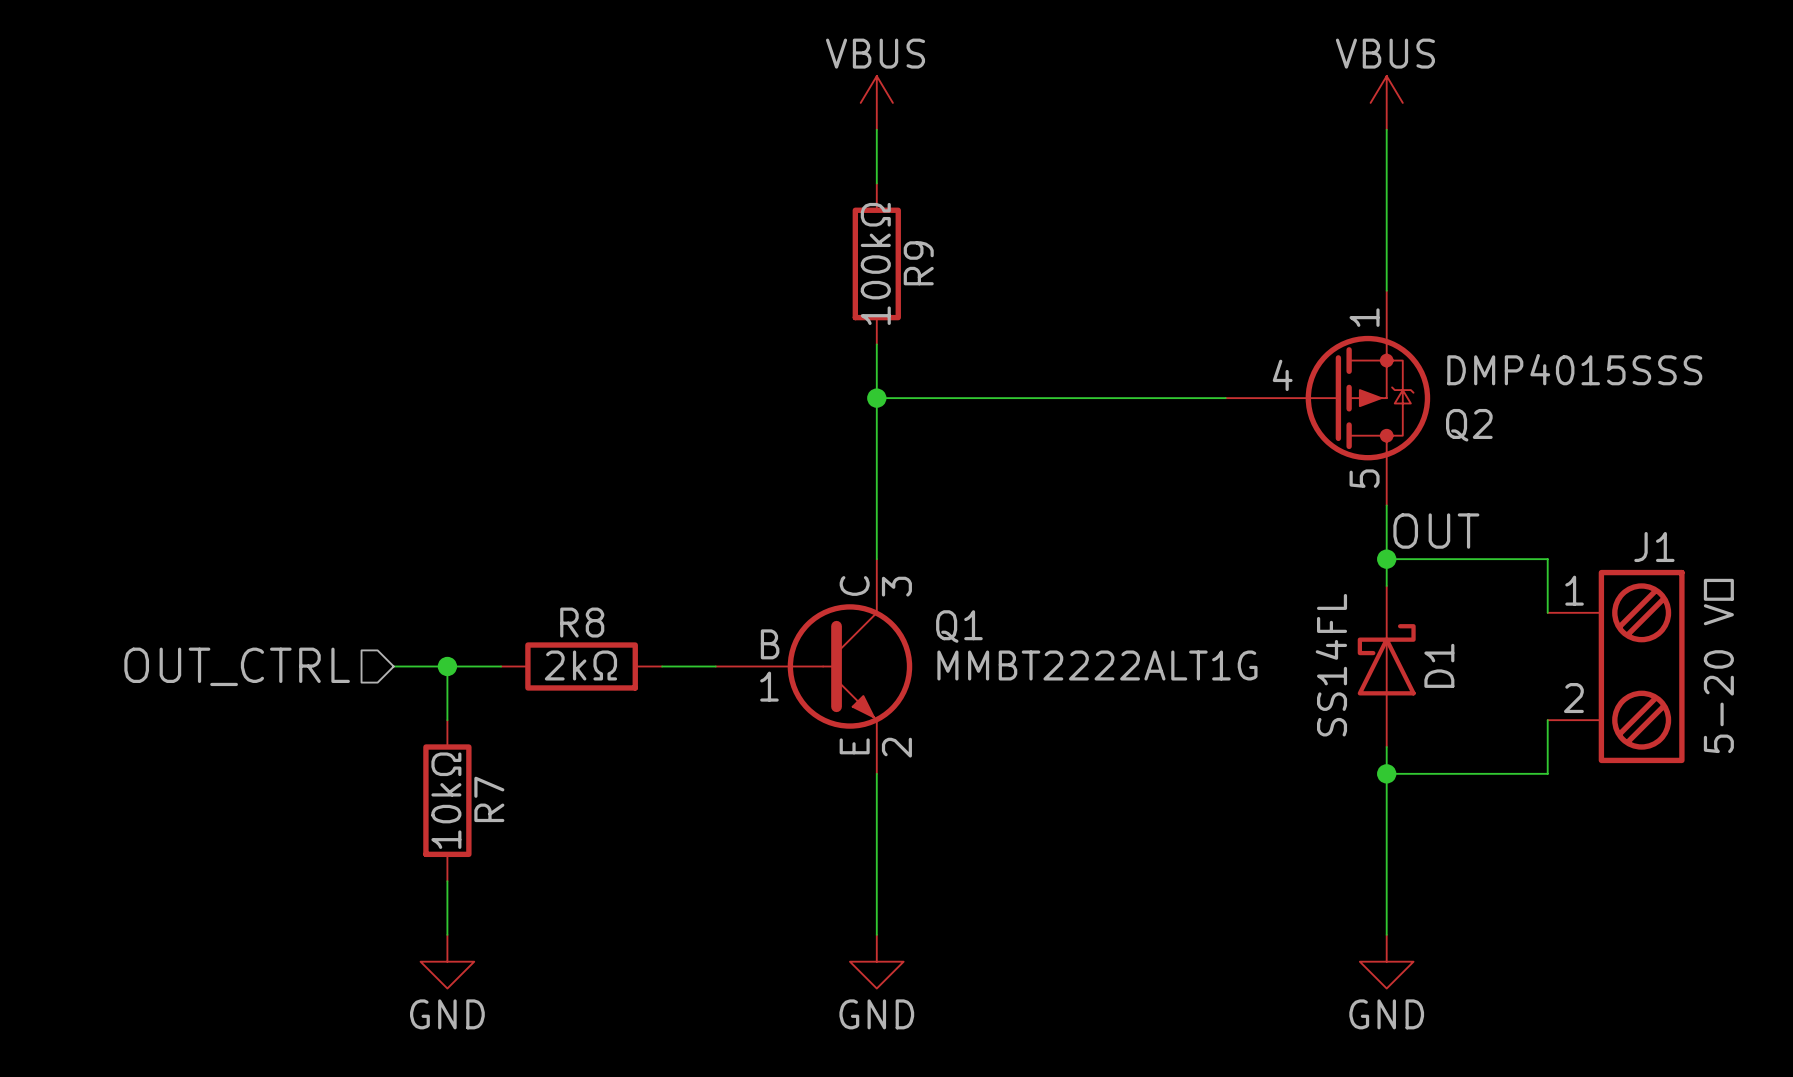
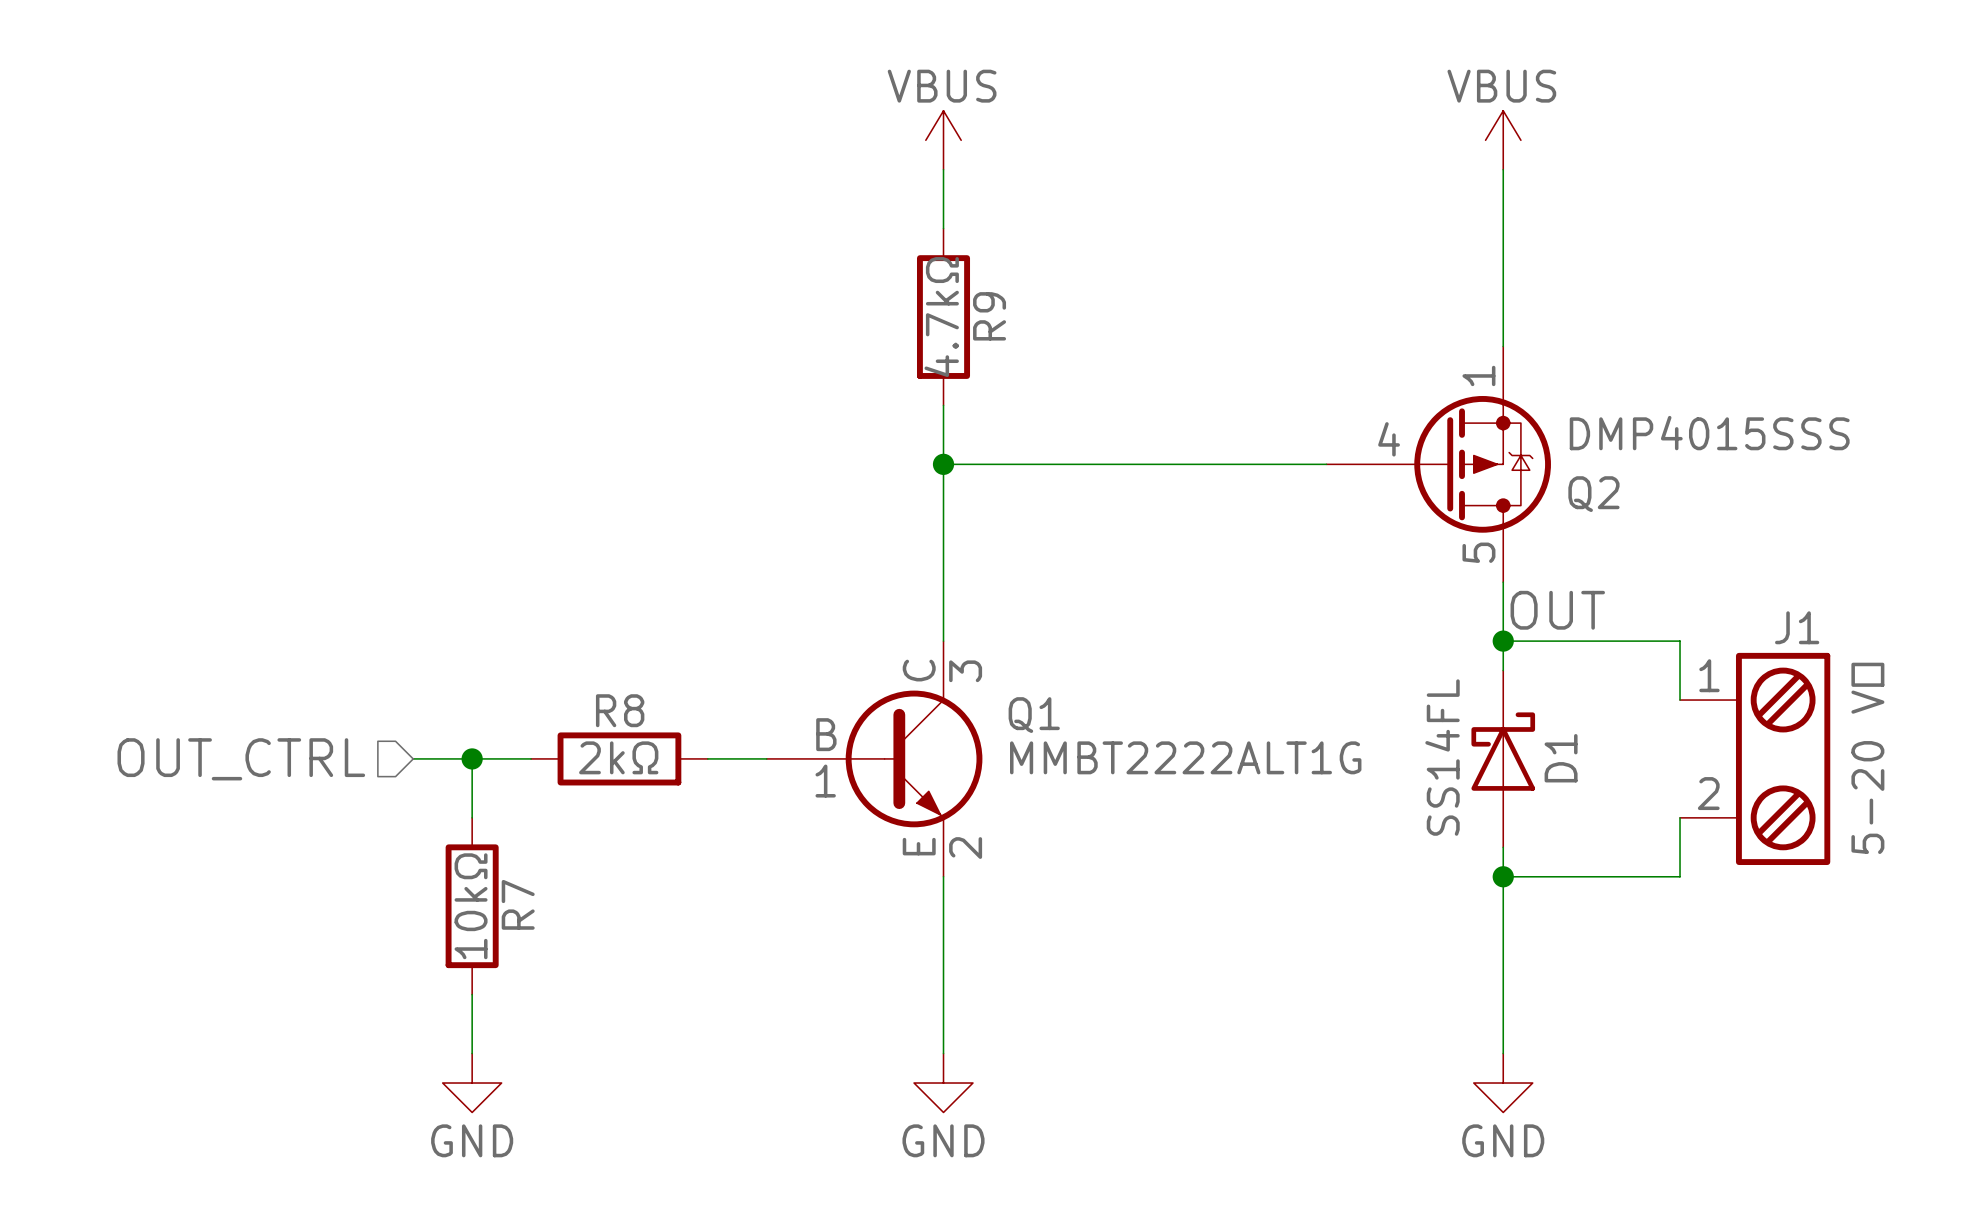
R9 value: 100kΩ (875, 263) -> 4.7kΩ (941, 317)

